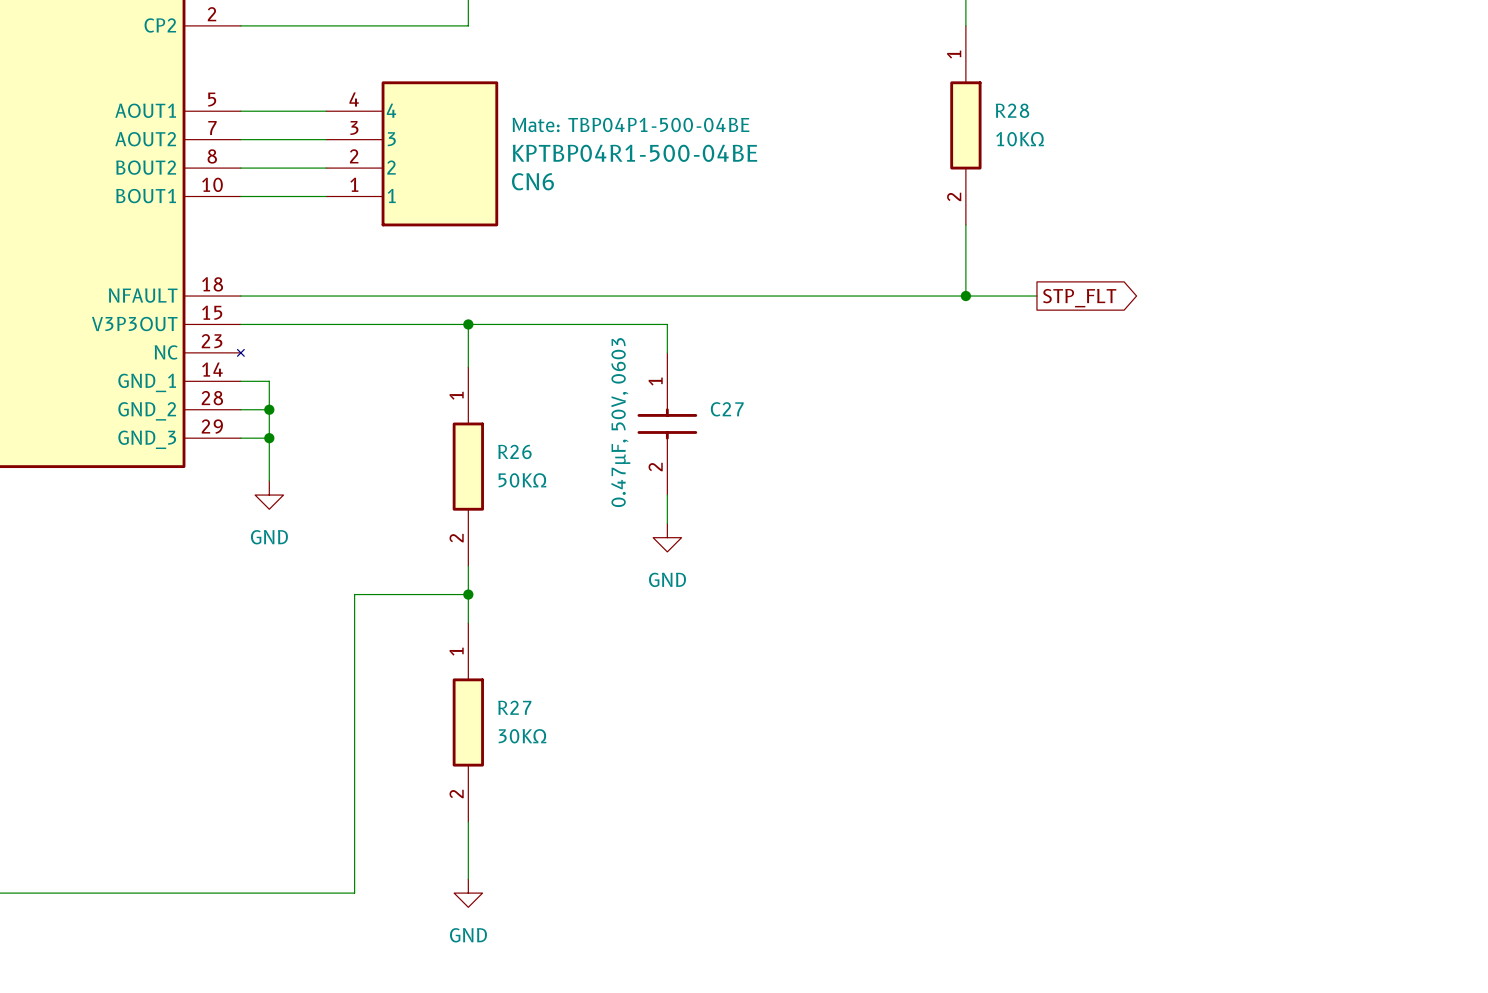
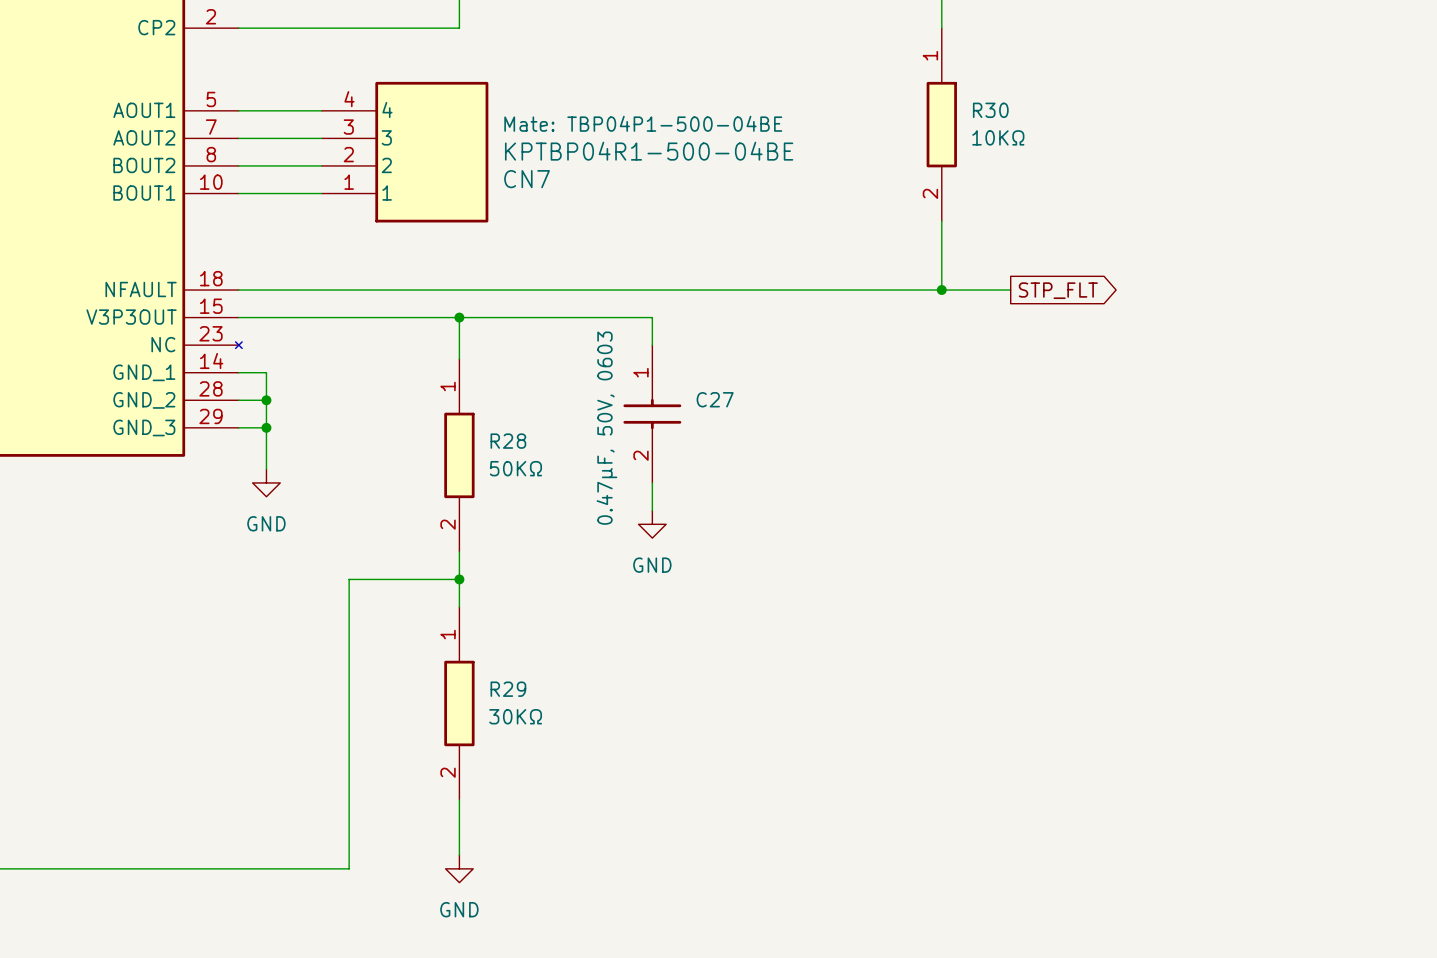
R28 name: R28 (1012, 110) -> R30 (990, 110)
CN6 name: CN6 (532, 181) -> CN7 (527, 179)
R26 name: R26 (514, 451) -> R28 (508, 441)
R27 name: R27 (514, 707) -> R29 (508, 689)

